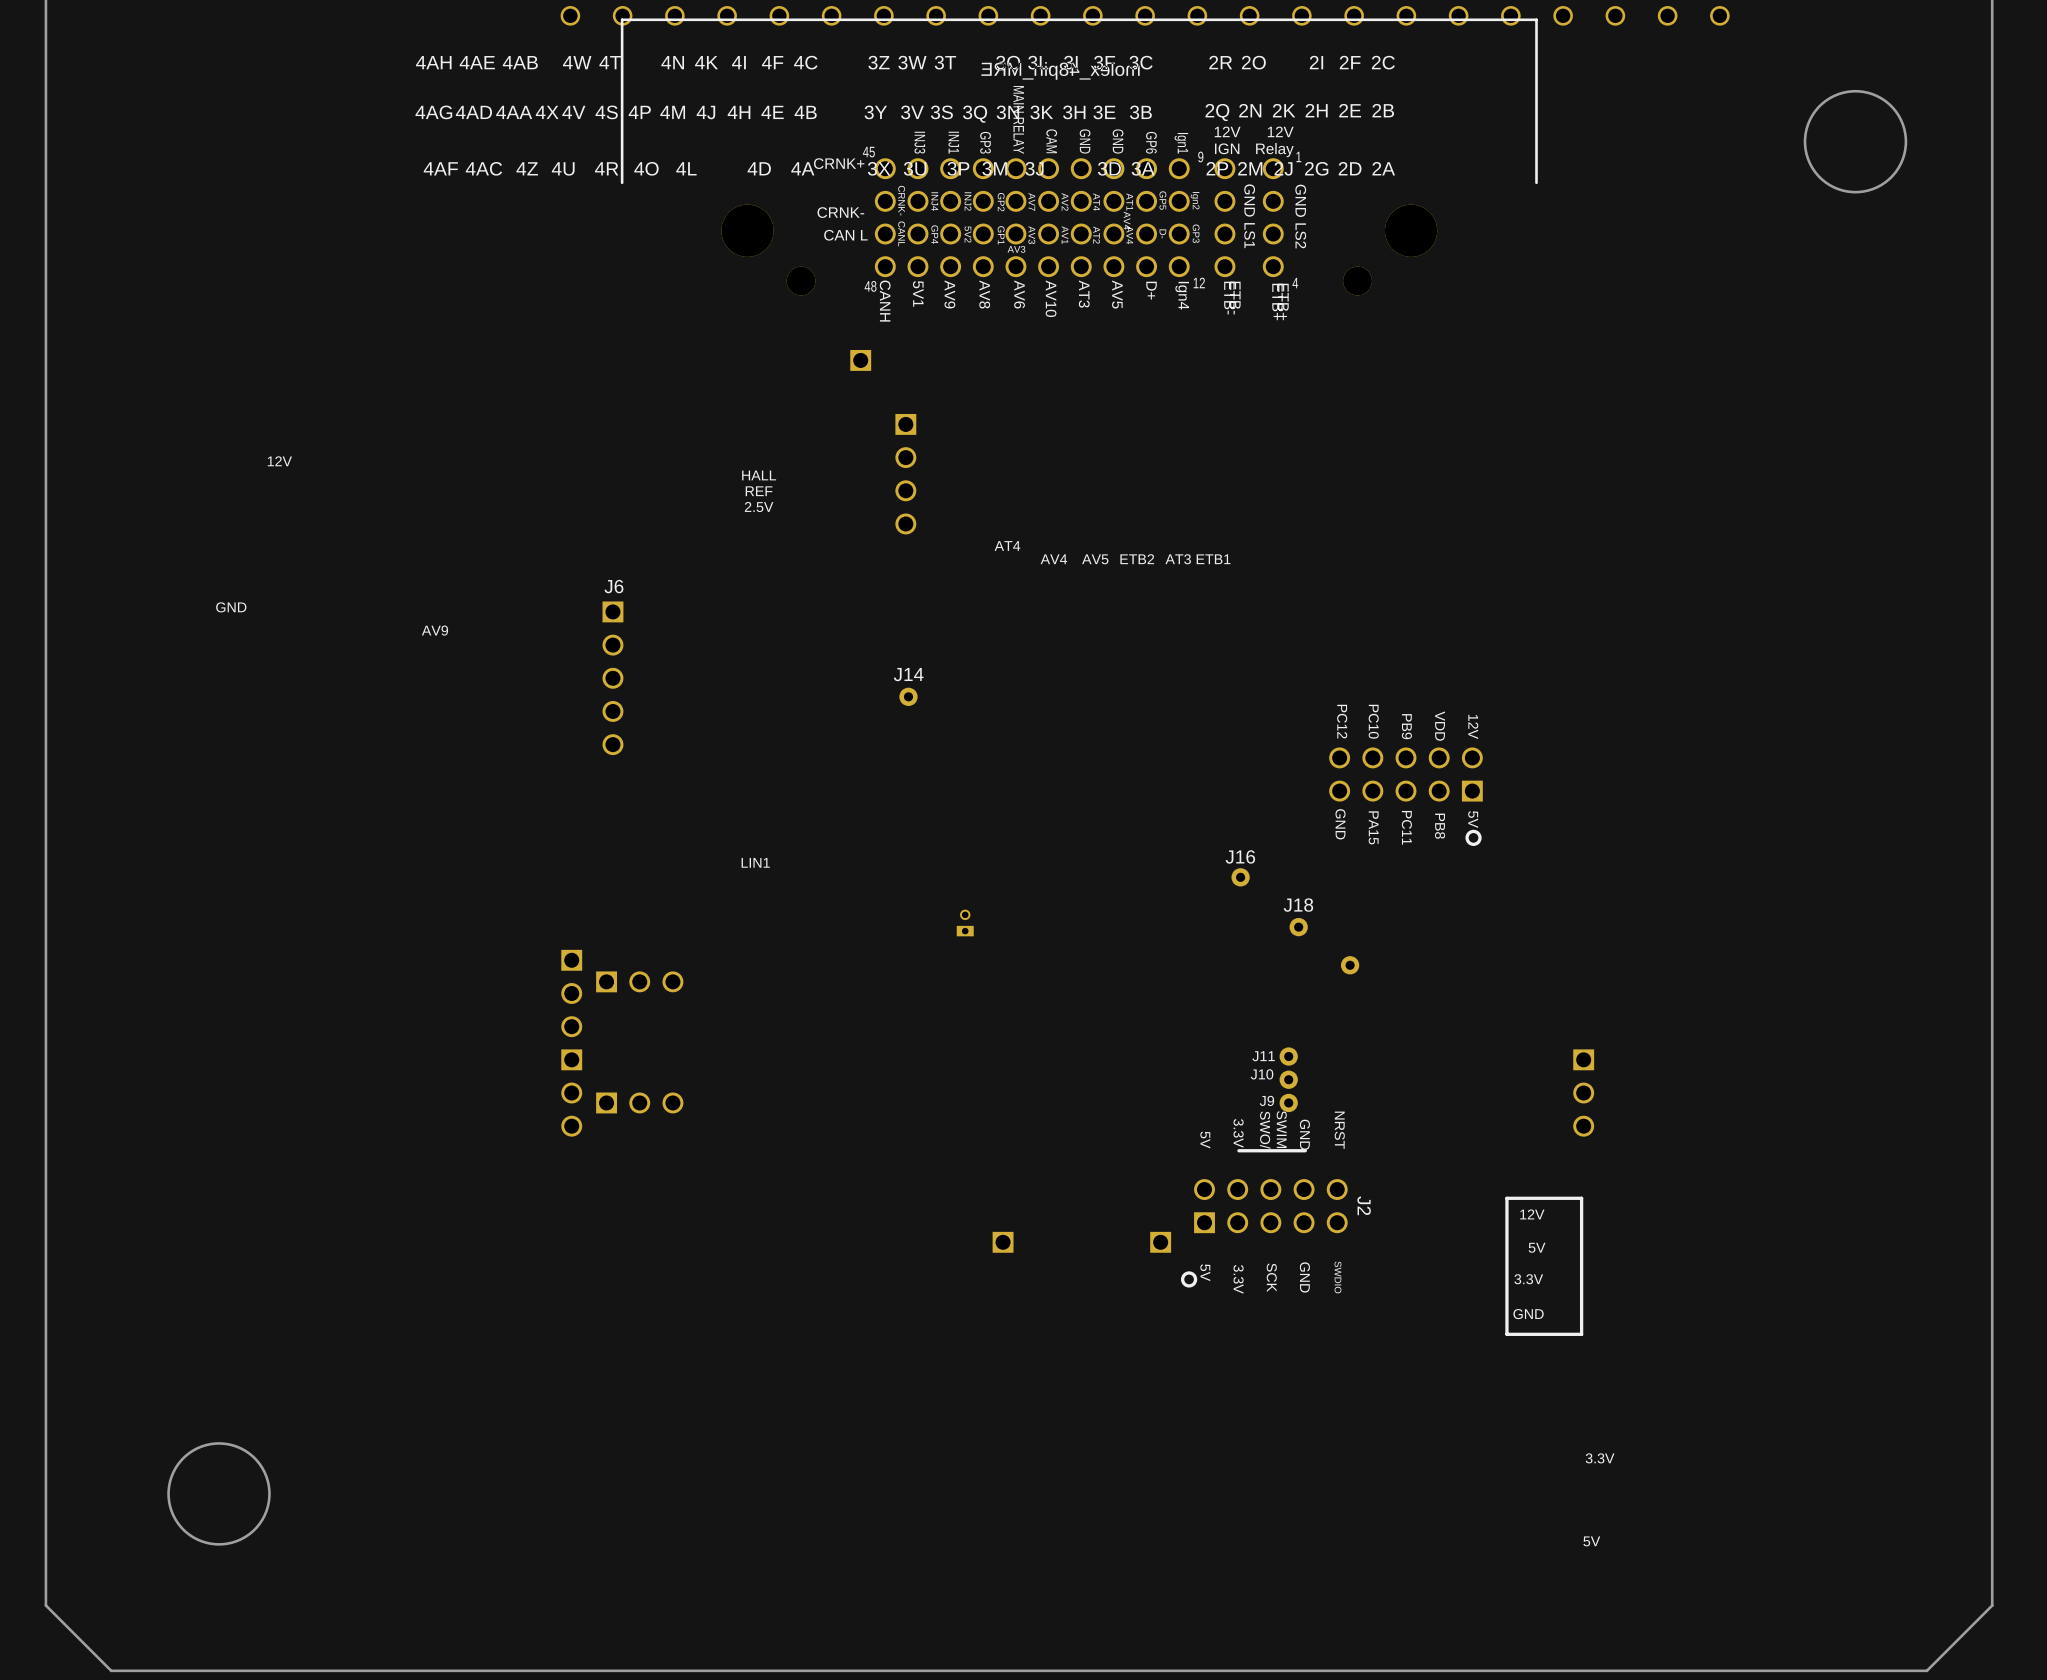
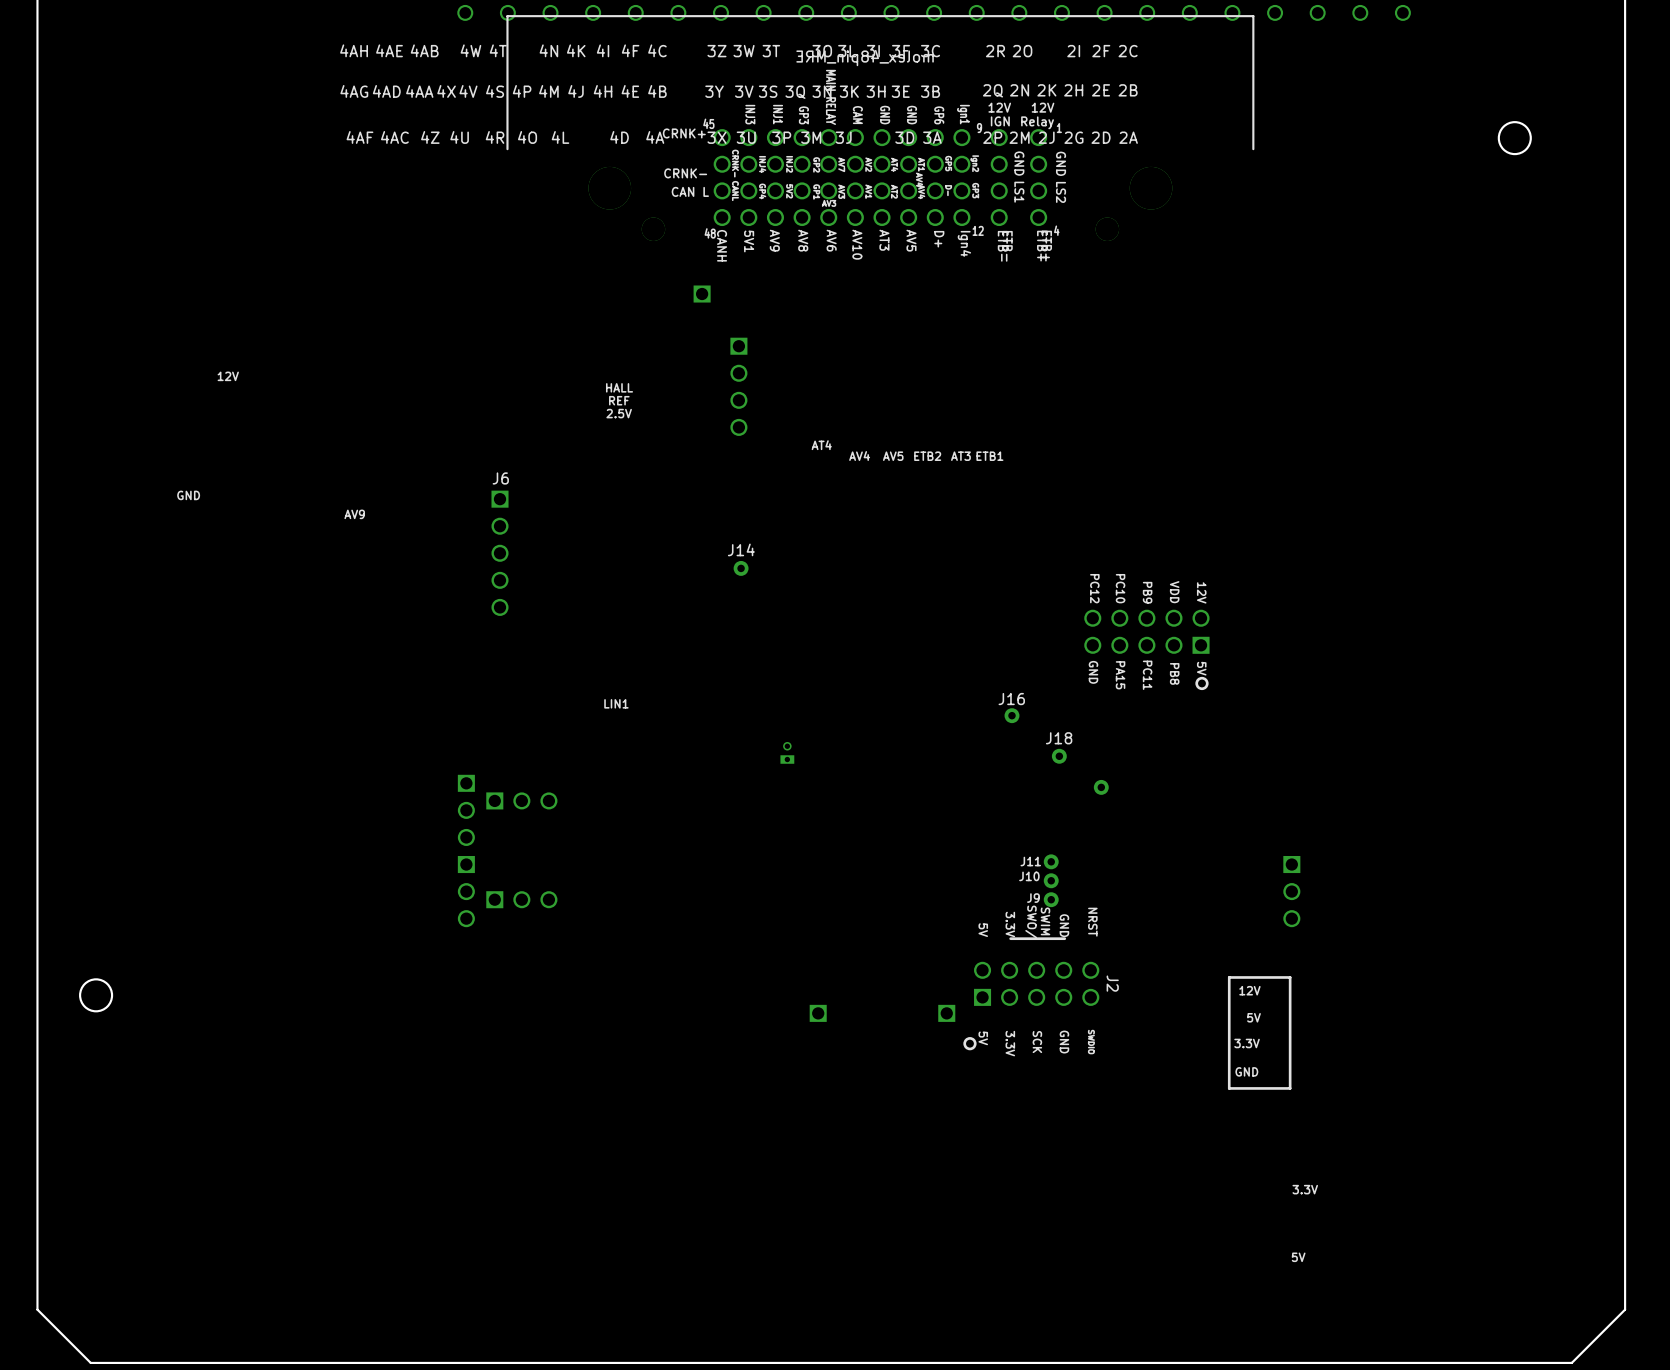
round board edge: [1803, 89, 1908, 194] -> none
round board edge: none -> [1497, 121, 1532, 156]
round board edge: none -> [79, 978, 114, 1013]
round board edge: [167, 1442, 271, 1546] -> none

